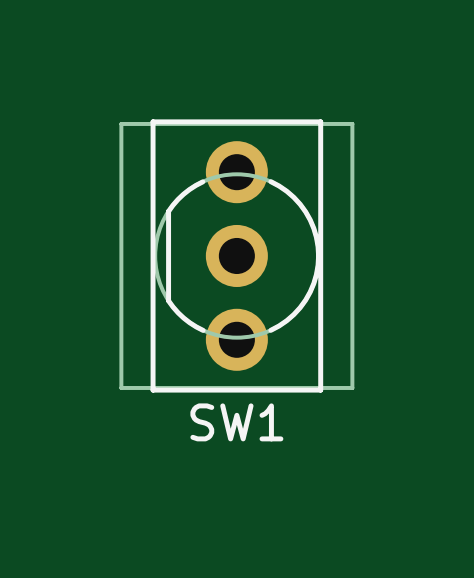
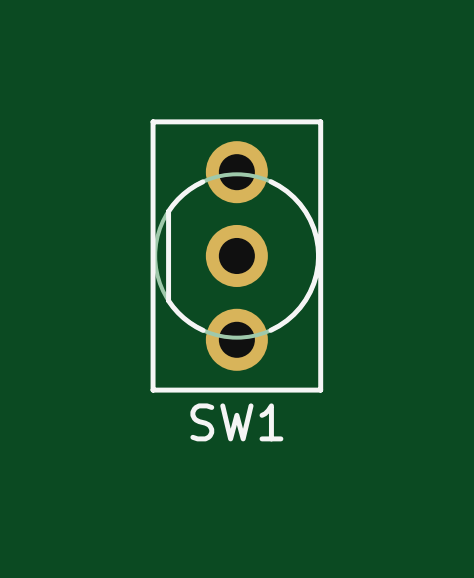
SW1 footprint: [119, 119, 355, 393] -> [150, 119, 324, 393]

